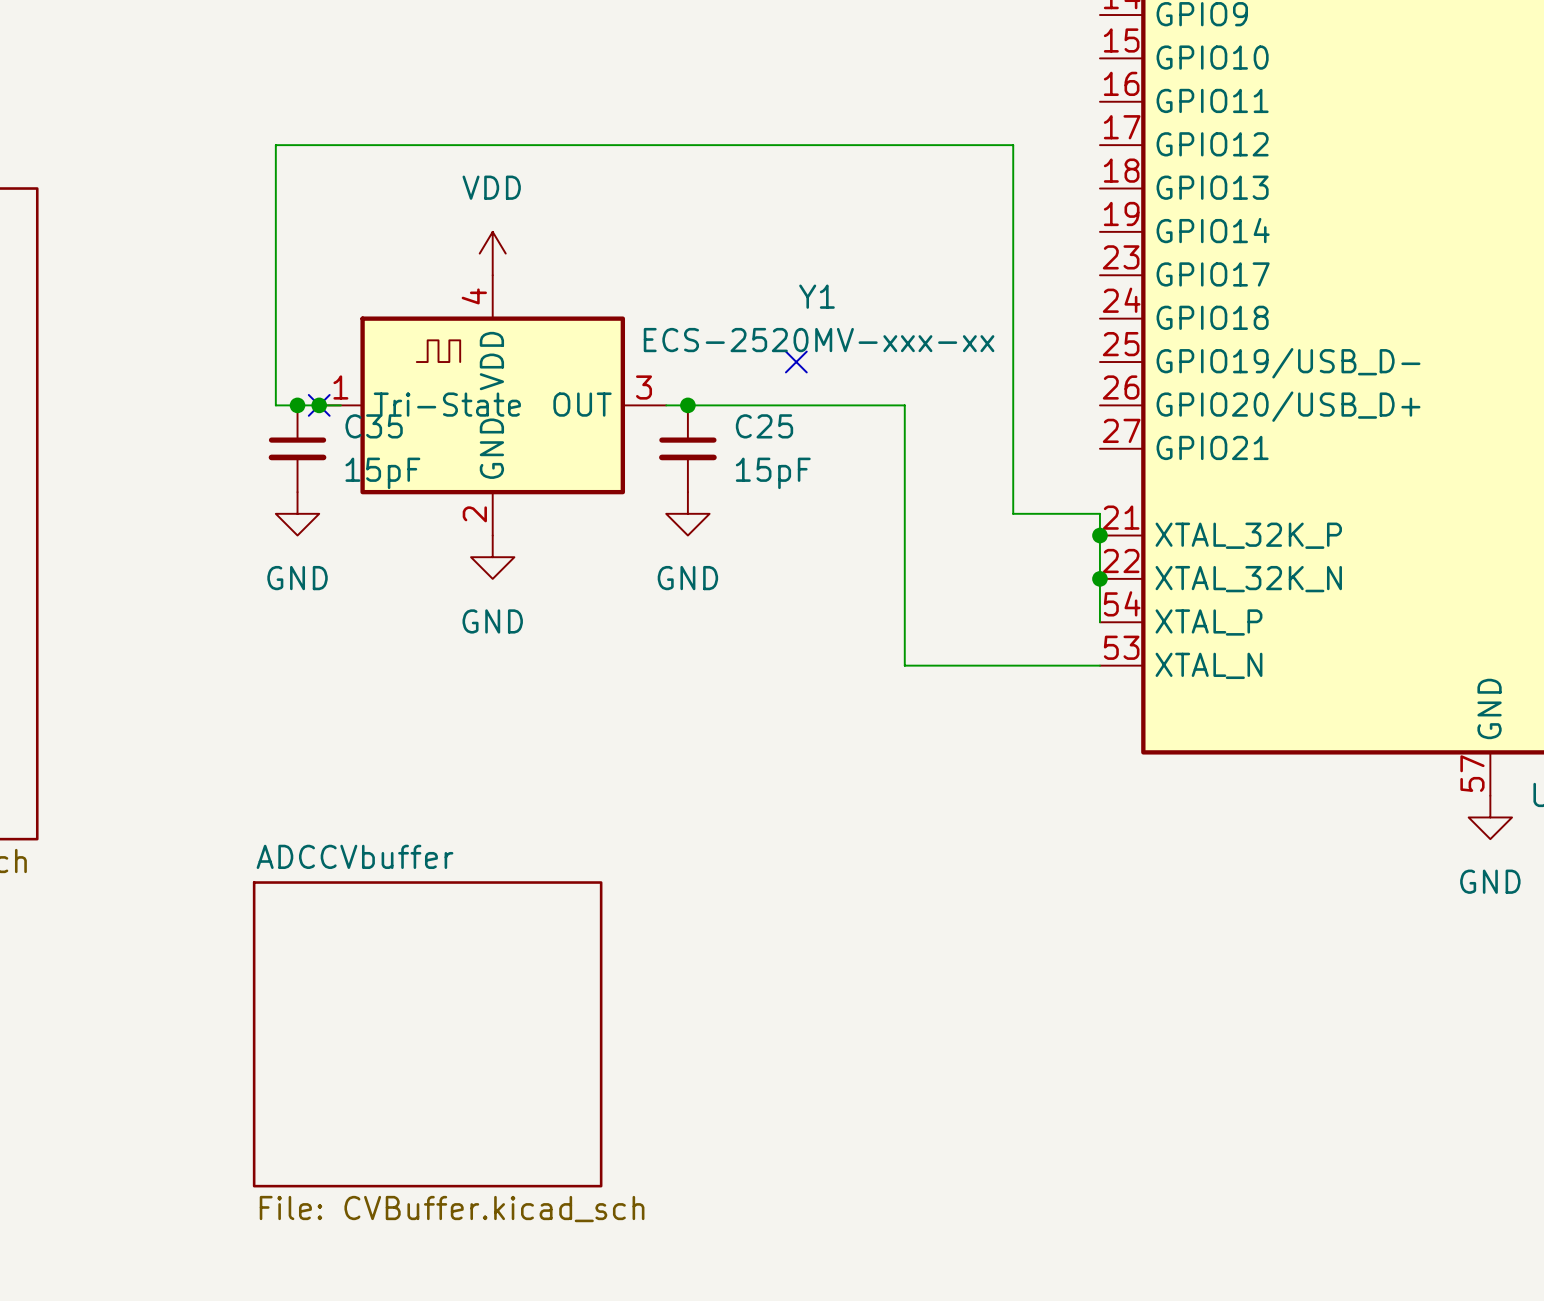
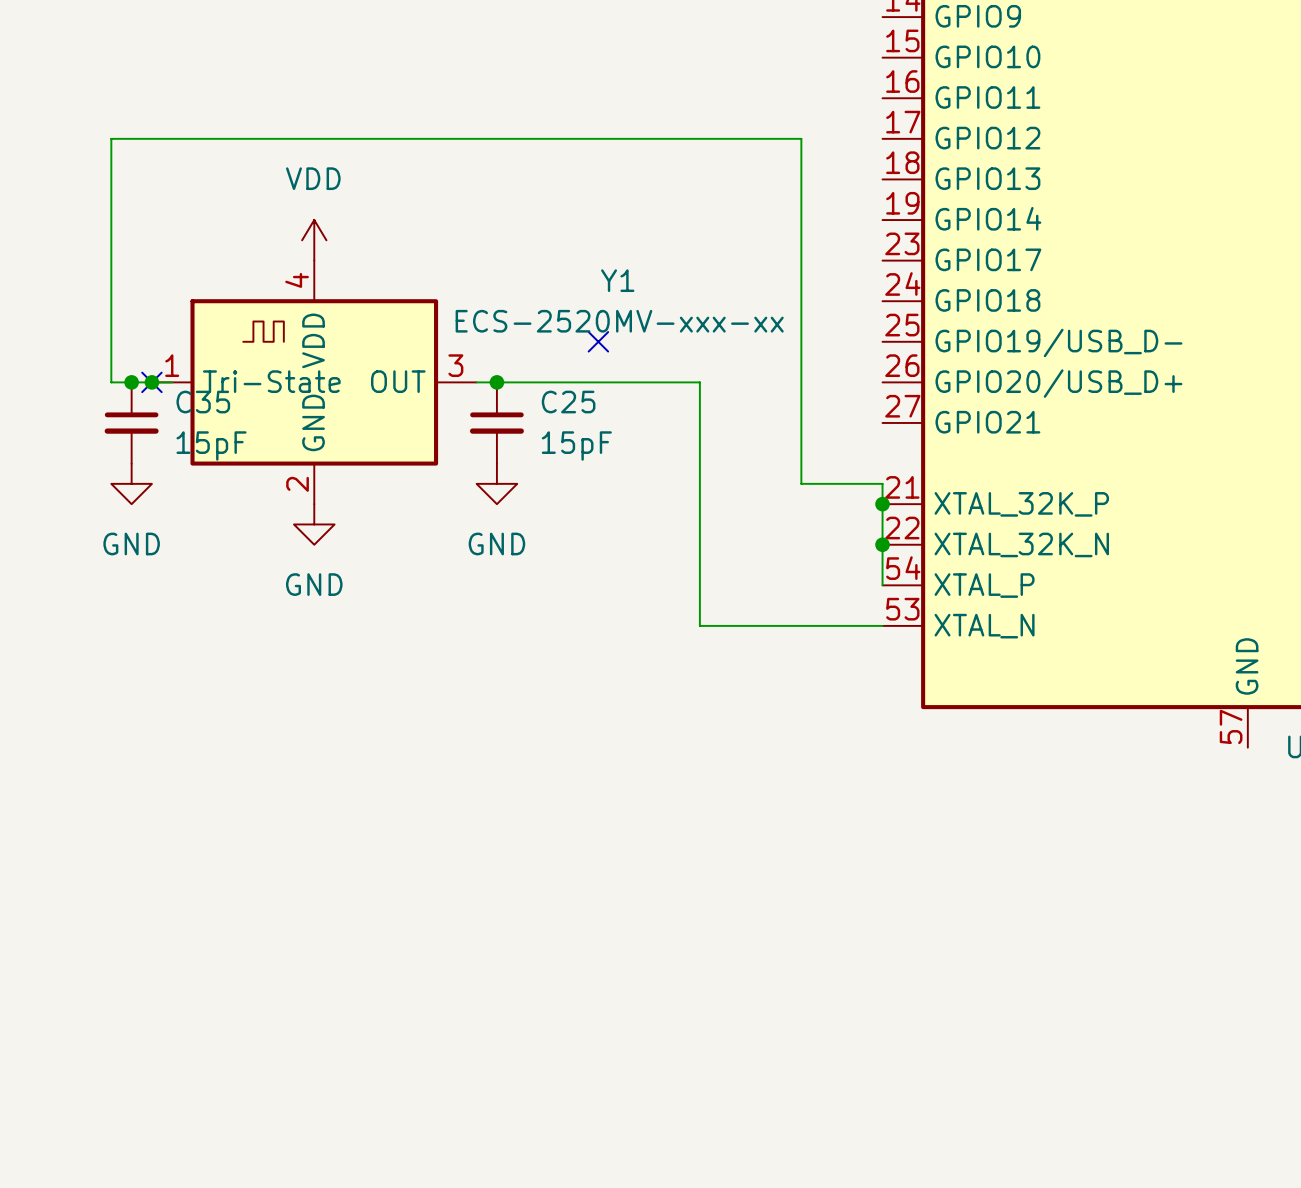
power symbol: GND (1490, 817) -> none
sheet ADCCVbuffer: File: CVBuffer.kicad_sch (427, 1034) -> none

